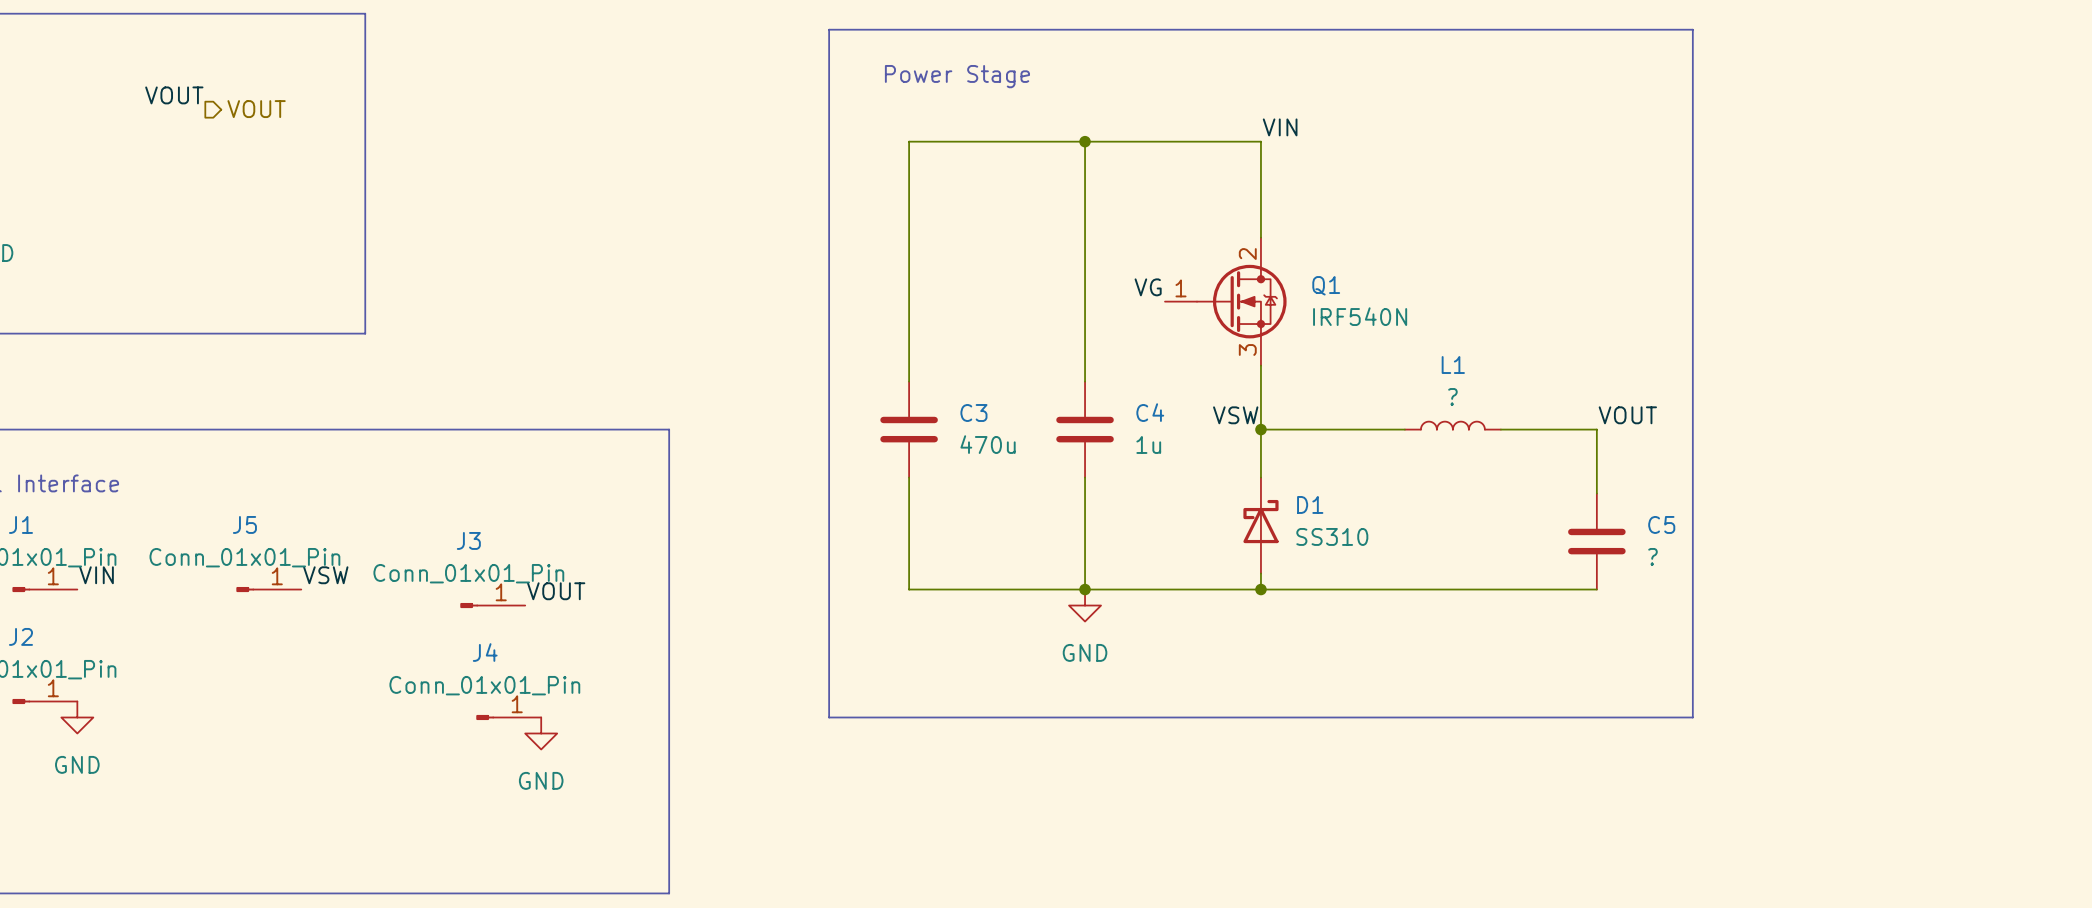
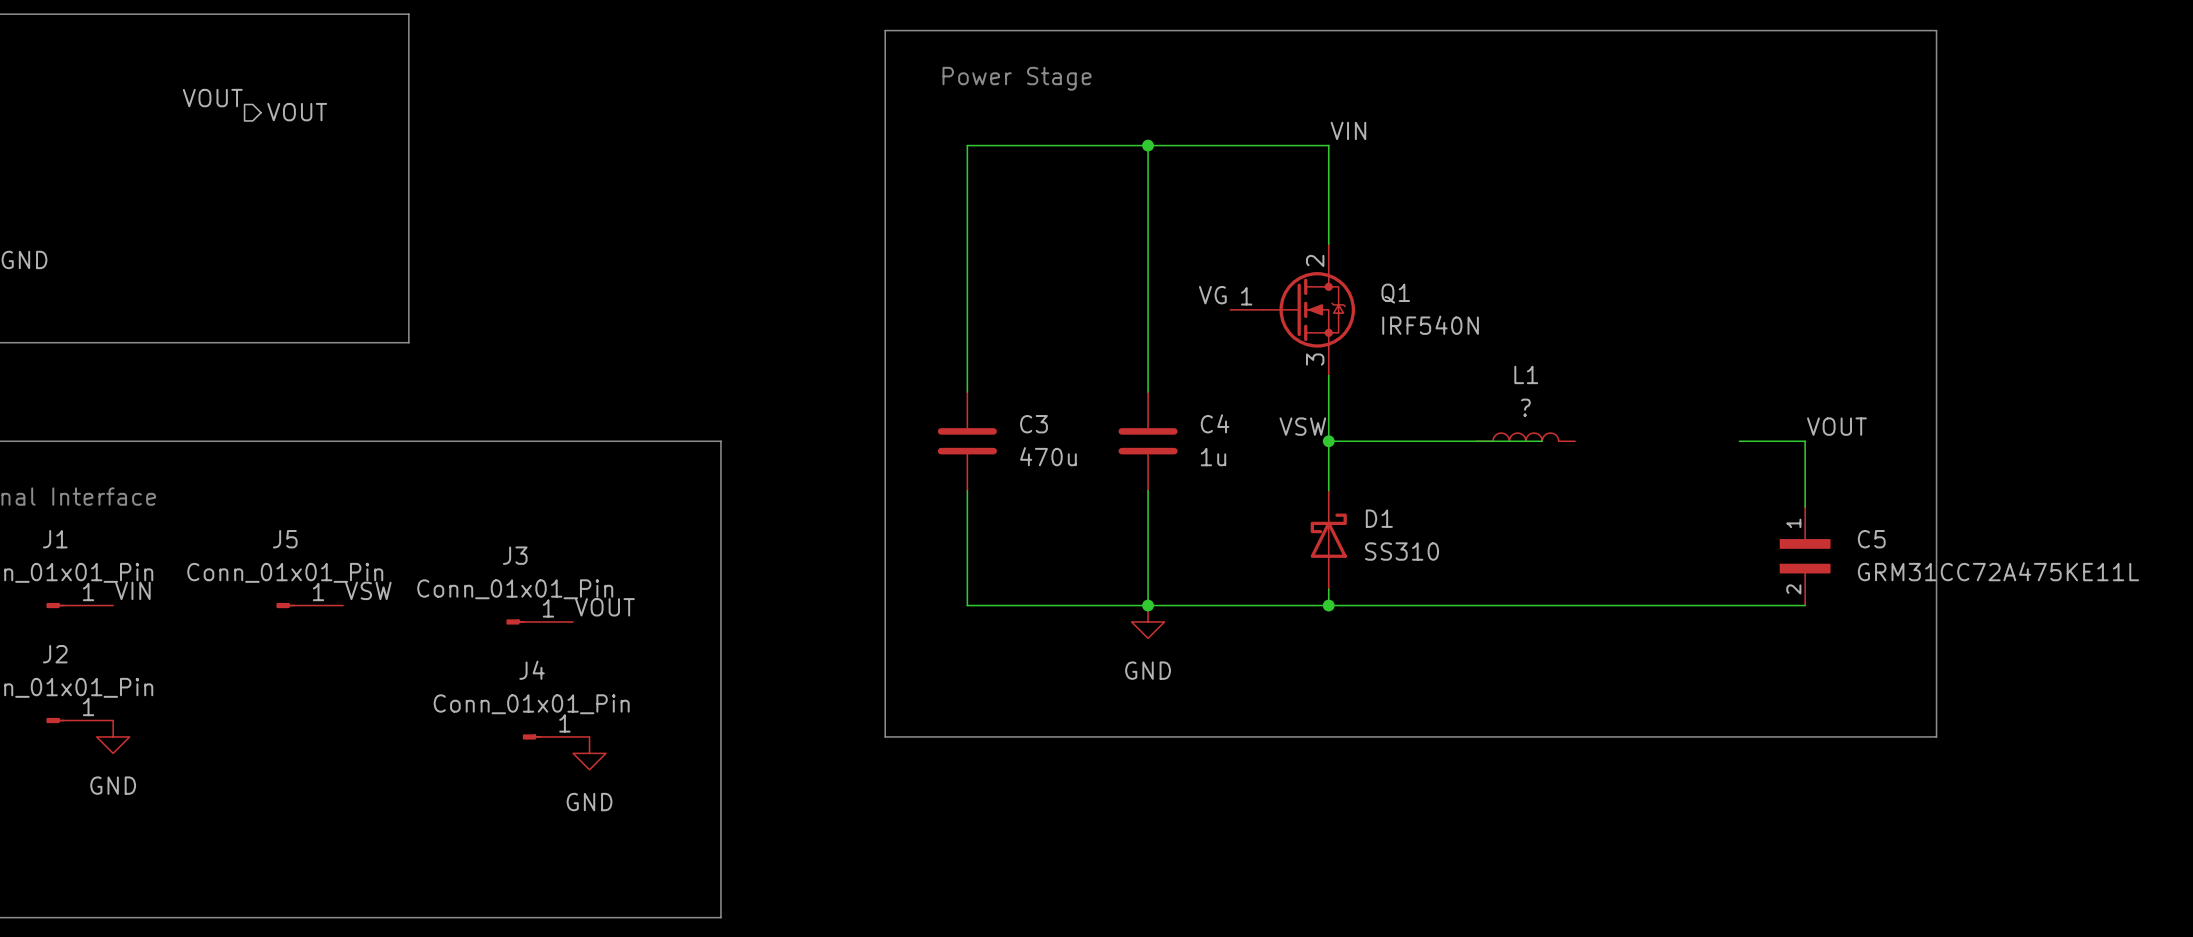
line: (1692, 29) (1692, 717) -> (1772, 30) (1936, 30) (1936, 736) (1772, 736)
label position: VOUT (1627, 415) -> VOUT (1836, 426)
wire: none -> (1476, 441) (1542, 441)
wire: (1500, 429) (1596, 429) (1596, 493) -> none
wire: none -> (1739, 441) (1805, 441) (1805, 506)
C5 symbol: [1568, 493, 1626, 590] -> [1779, 506, 1831, 606]
C5 value: ? (1652, 556) -> GRM31CC72A475KE11L (1998, 571)
wire: none -> (1673, 605) (1805, 605)

